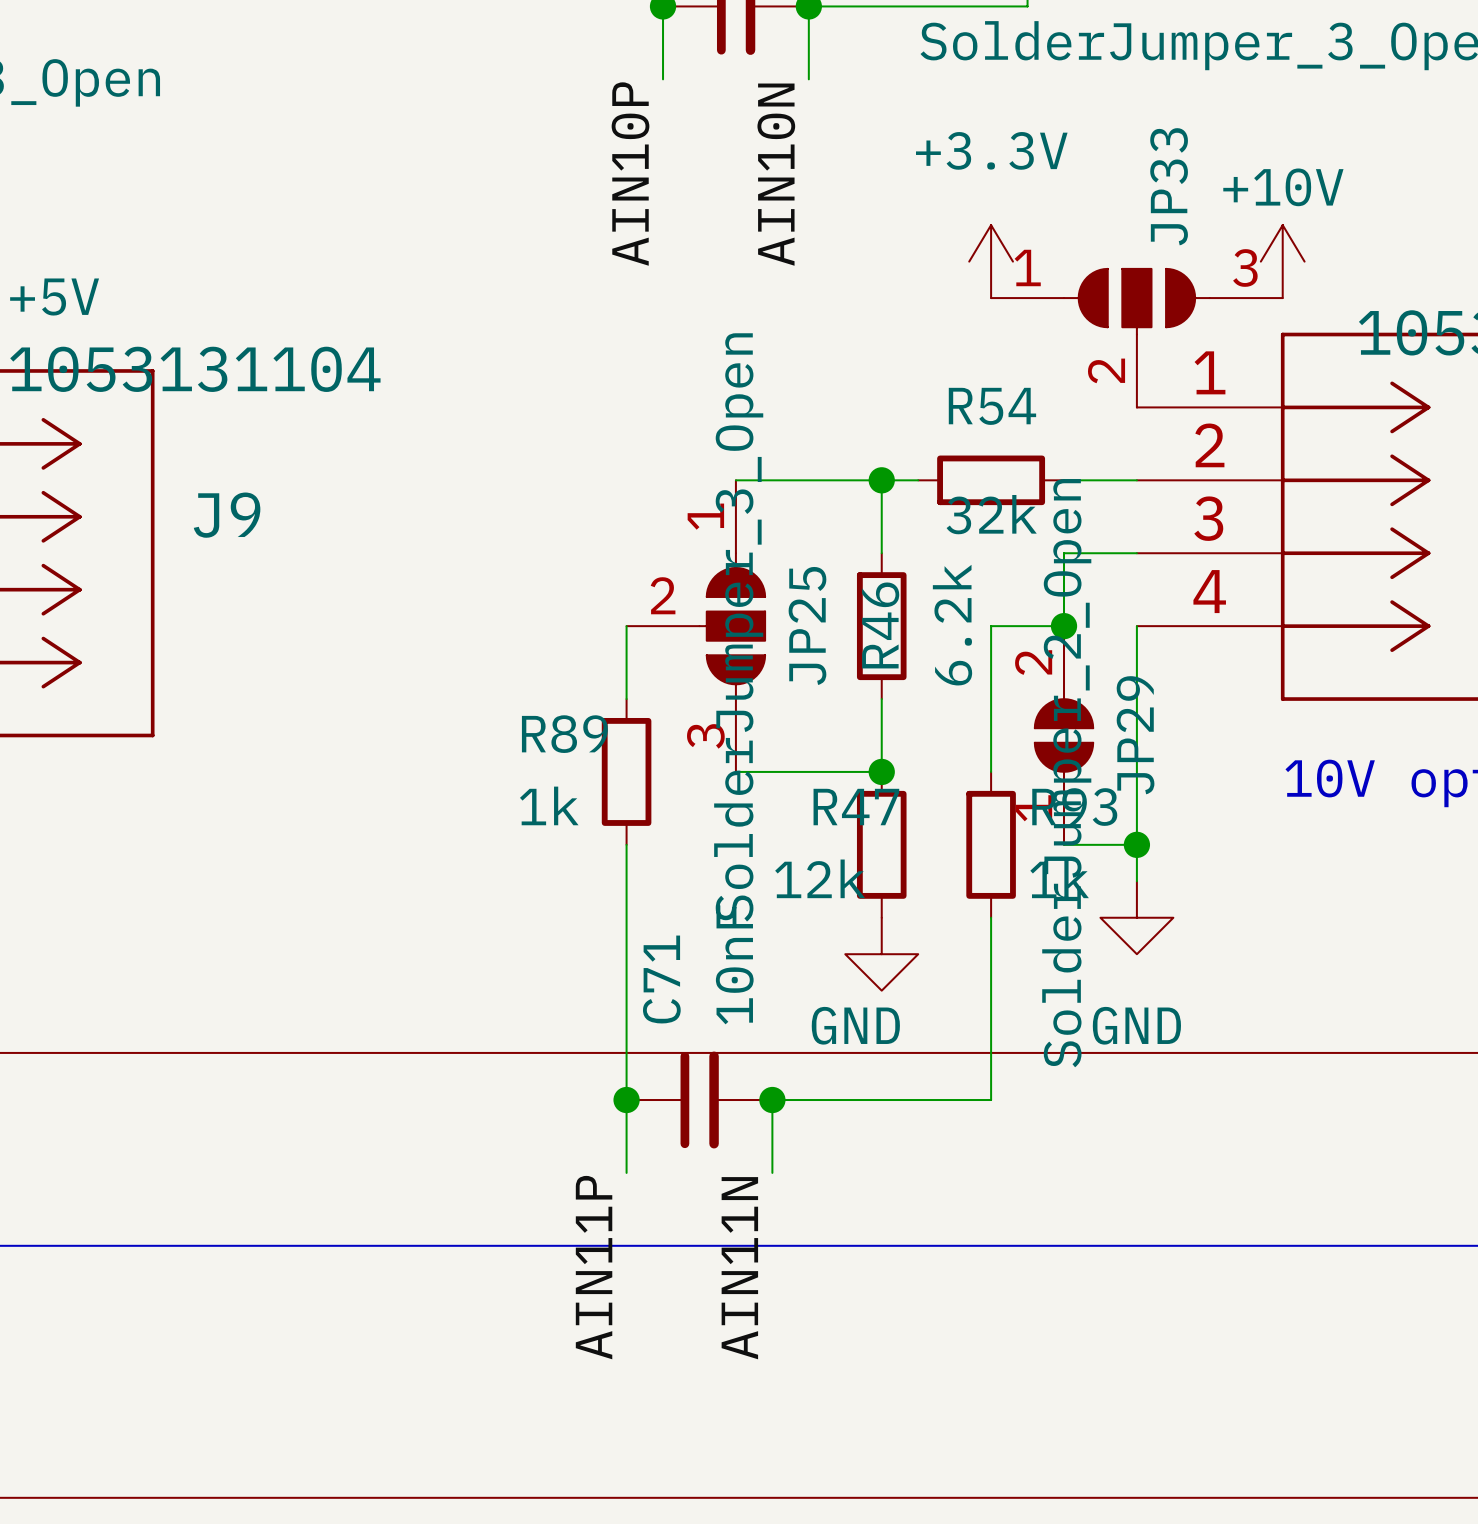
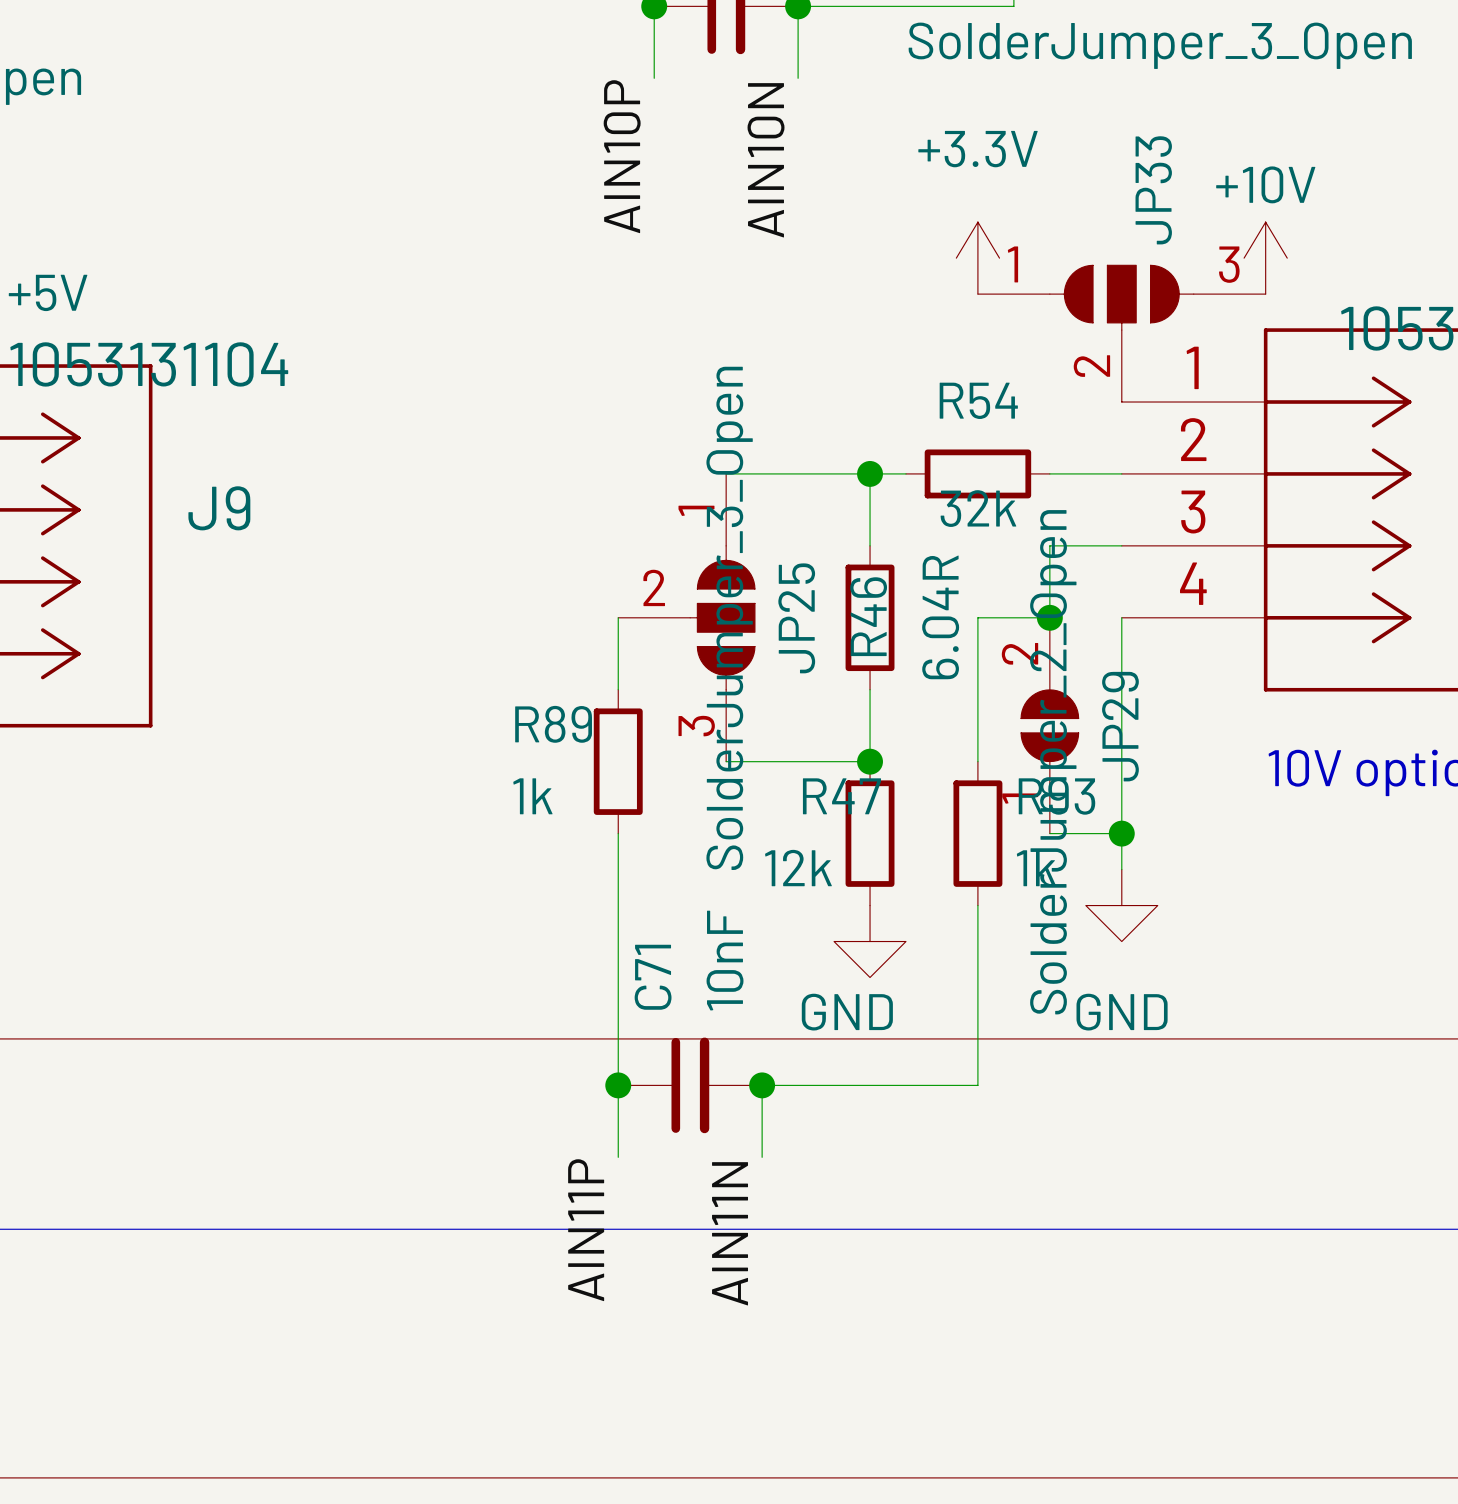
R46 value: 6.2k (952, 625) -> 6.04R (940, 617)

